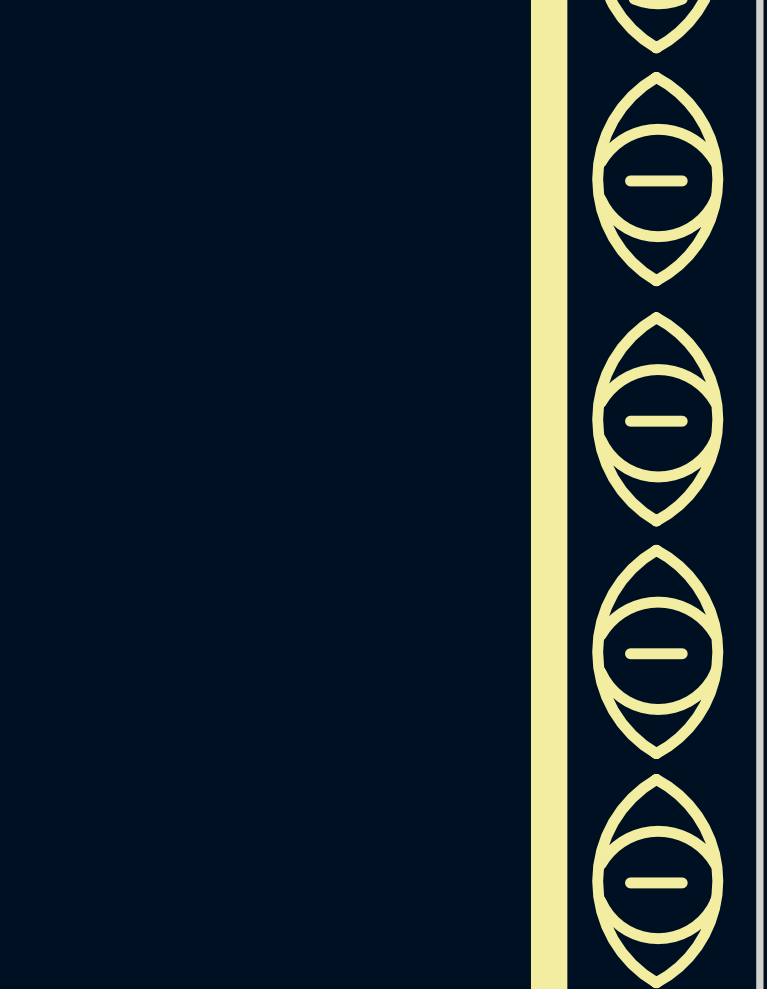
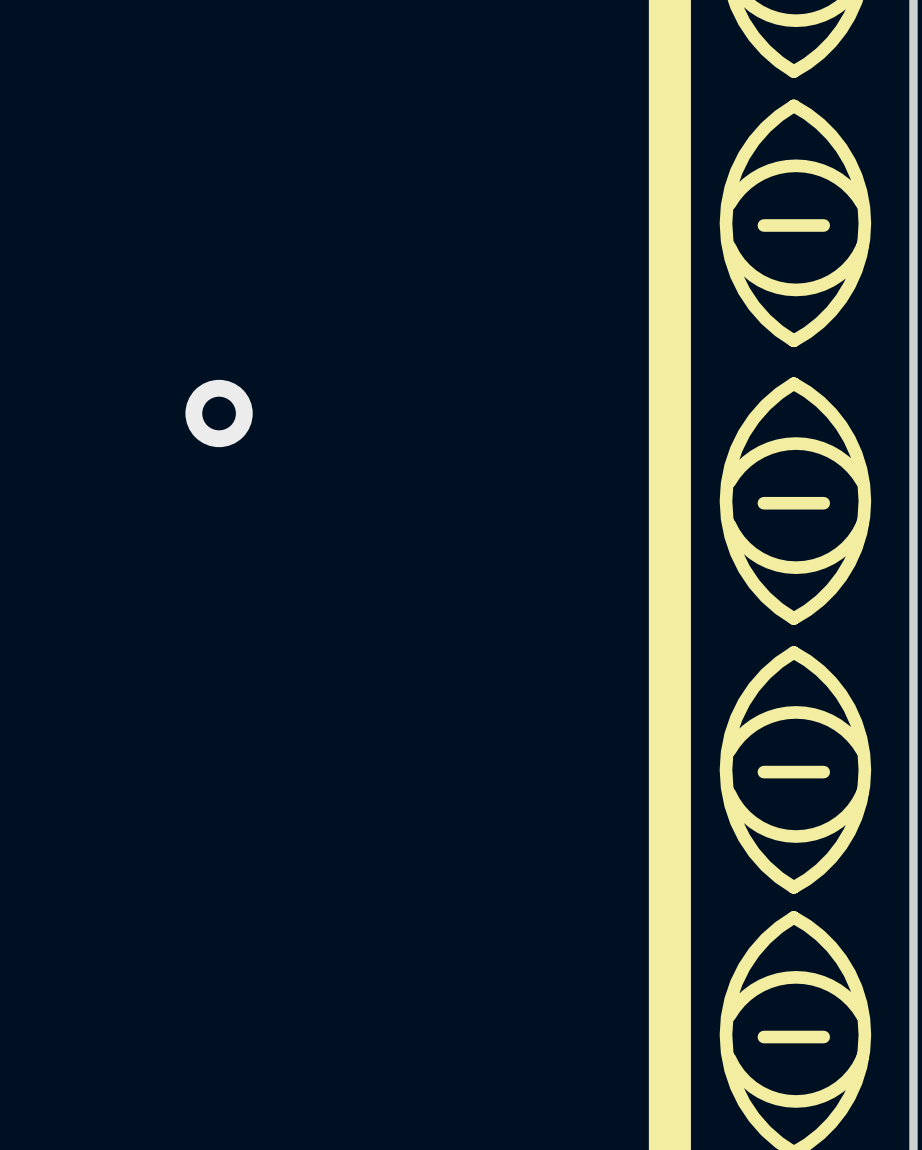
via: none -> (219, 413)

